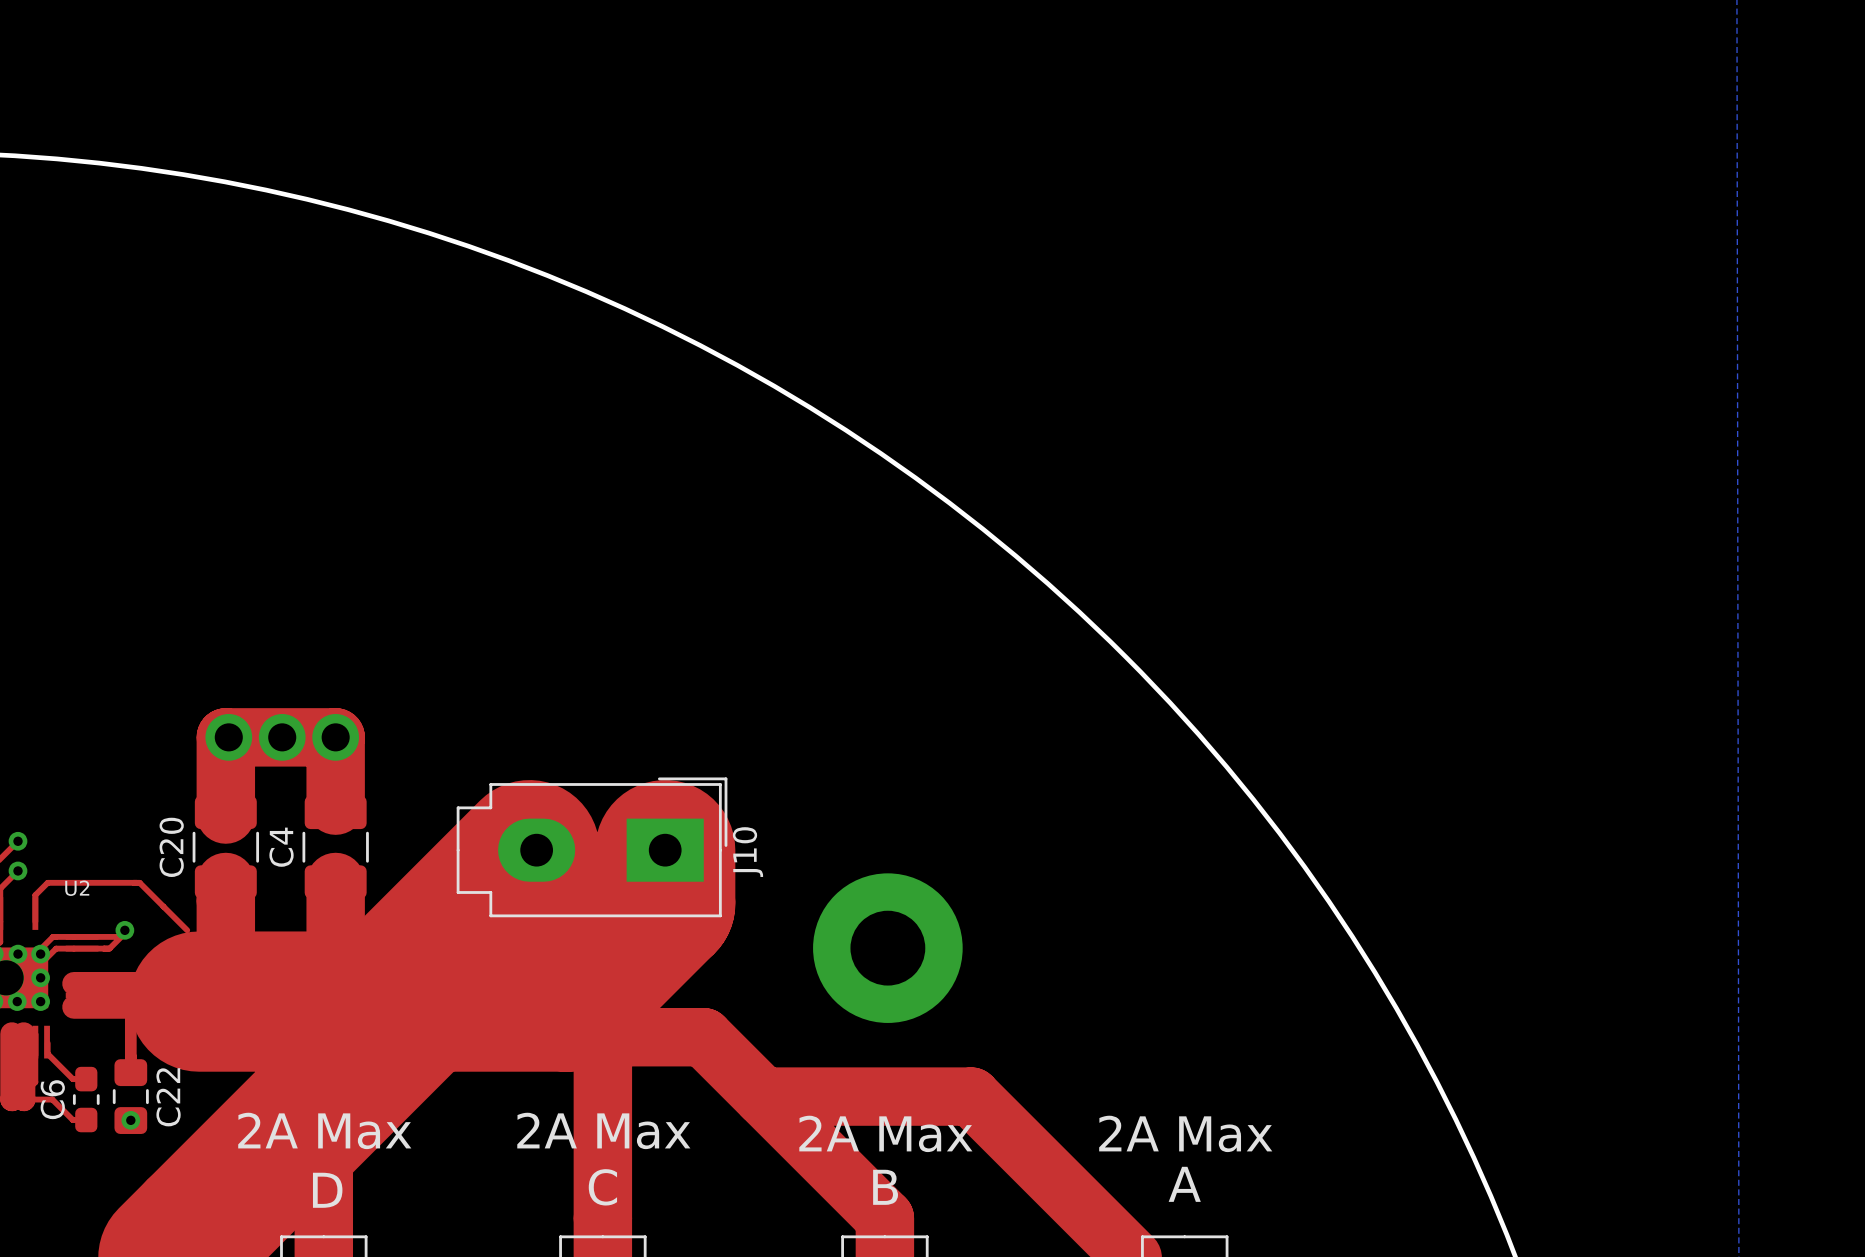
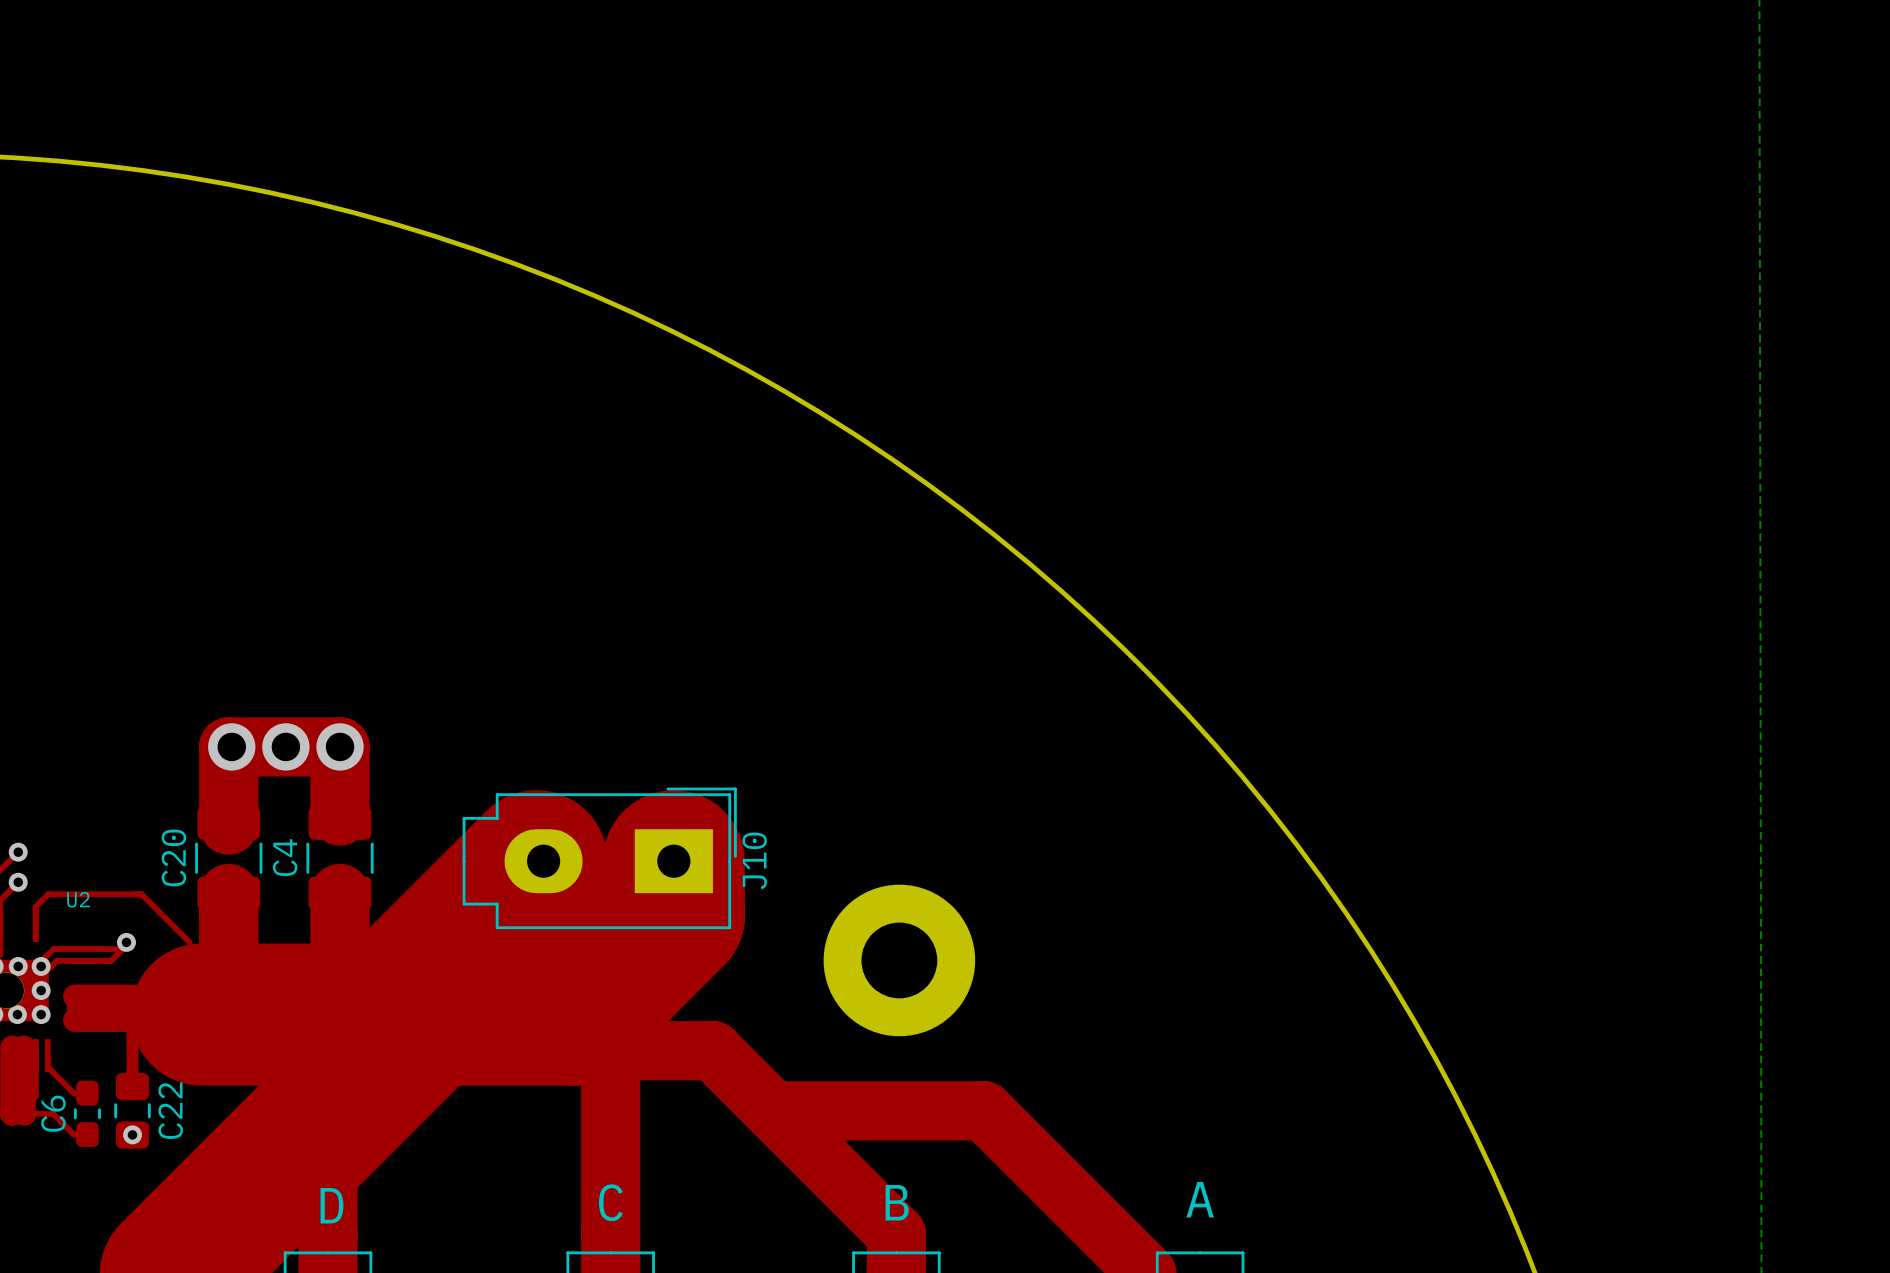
text: 2A Max (324, 1130) -> none
text: 2A Max (603, 1130) -> none
text: 2A Max (885, 1133) -> none
text: 2A Max (1185, 1133) -> none

